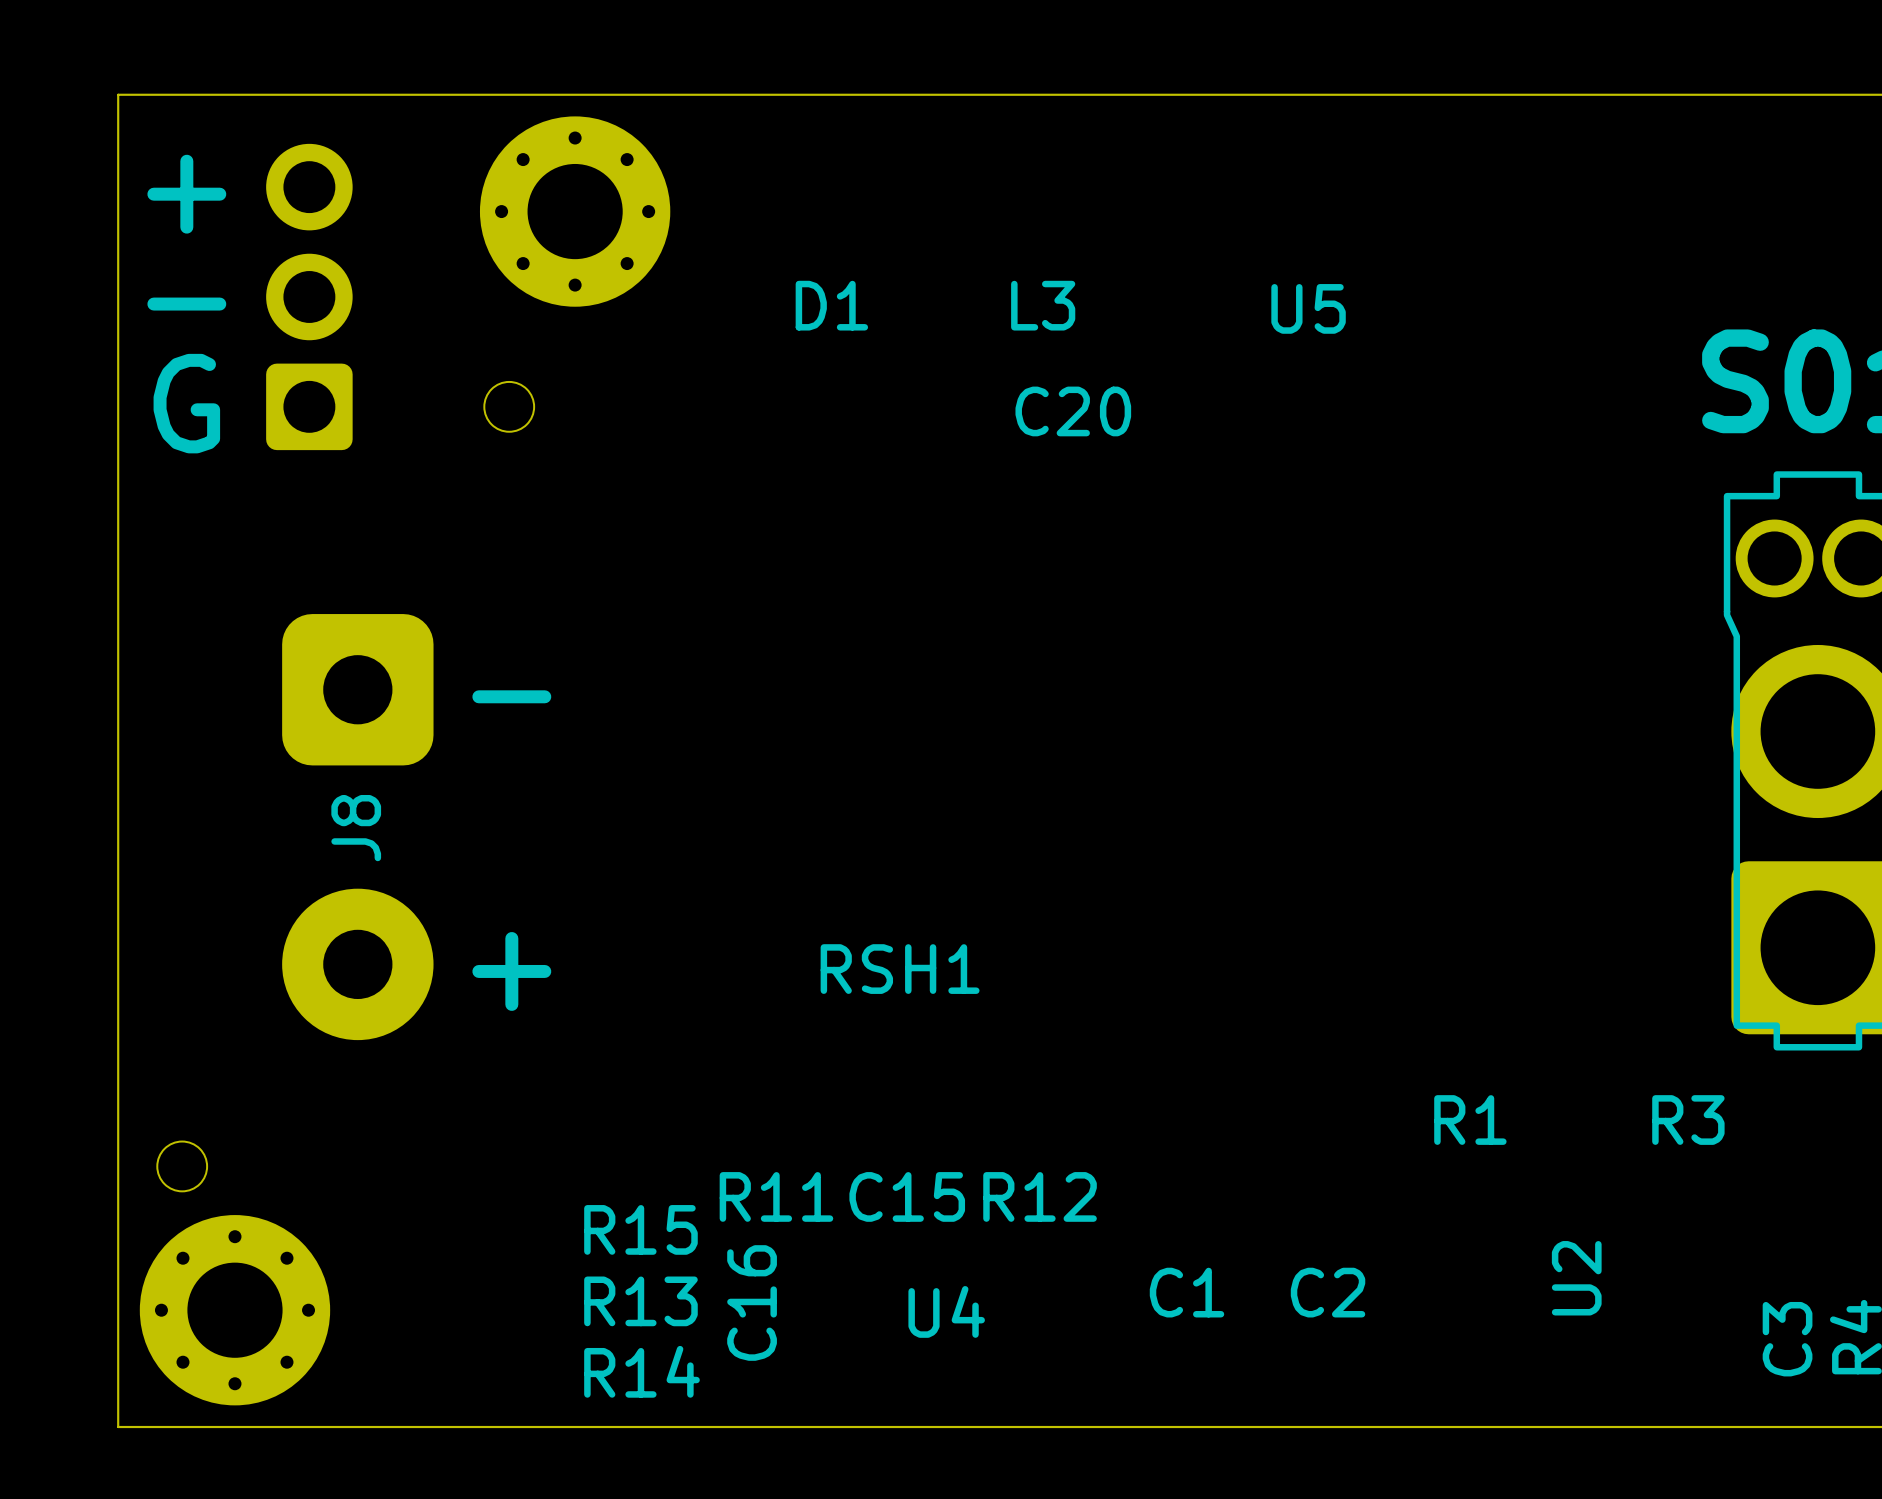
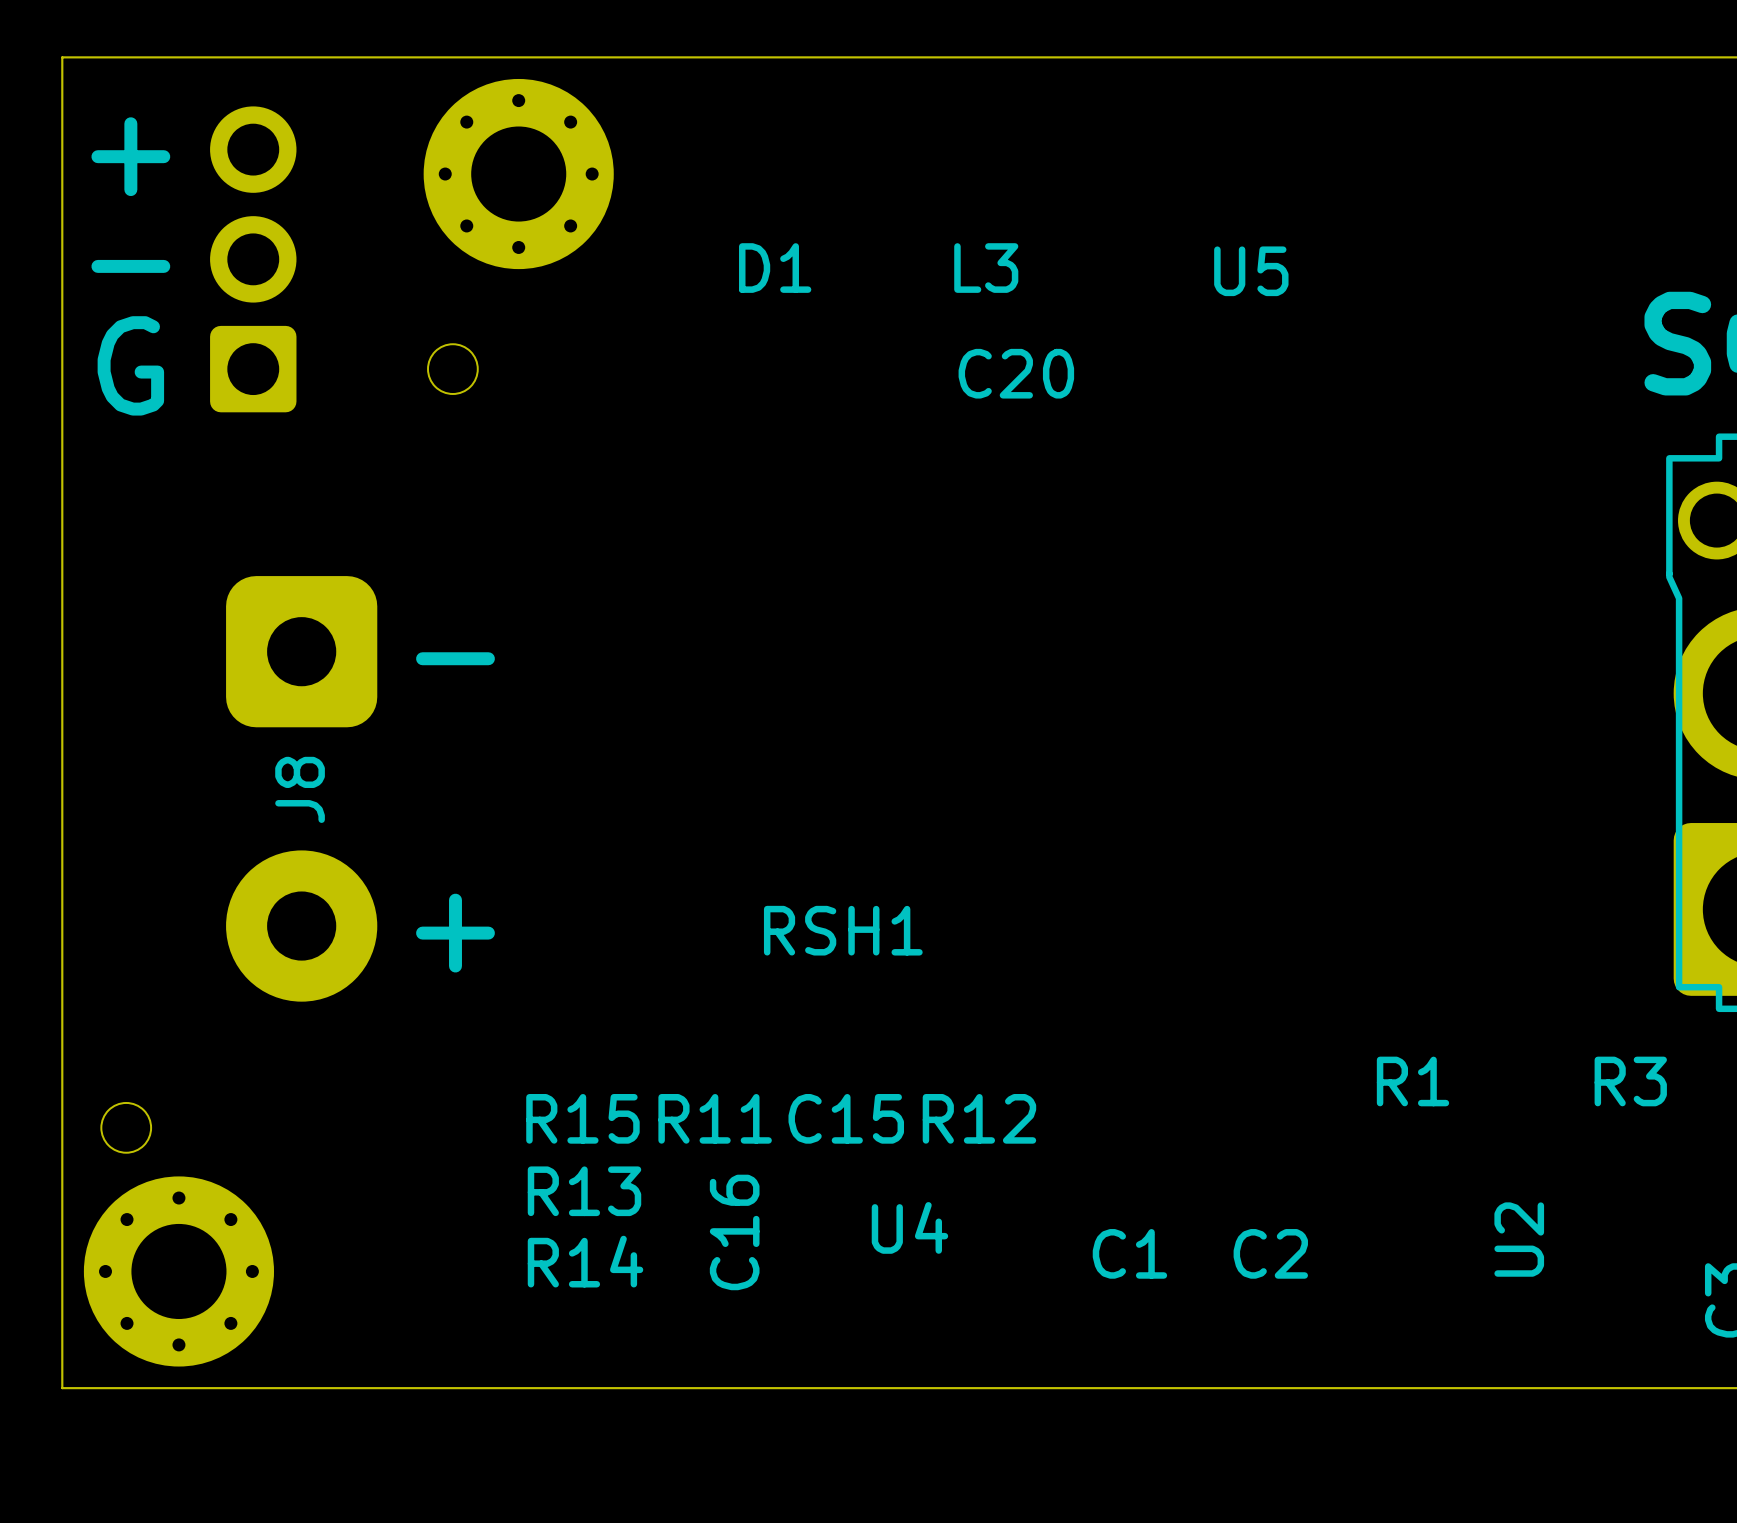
R15: none -> (582, 1118)
R11 position: (776, 1196) -> (715, 1118)
C15 position: (907, 1196) -> (846, 1118)
R12 position: (1040, 1196) -> (979, 1118)
R15 name: R15 (640, 1229) -> R13 (584, 1191)
R13 name: R13 (640, 1301) -> R14 (585, 1261)
C16 position: (752, 1302) -> (734, 1232)
U4 position: (946, 1311) -> (909, 1227)
R14: (641, 1371) -> none

